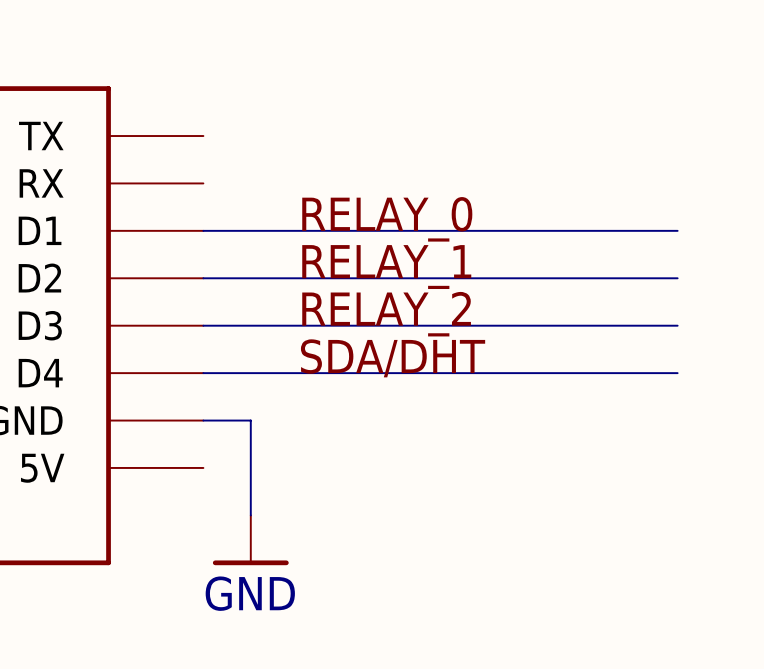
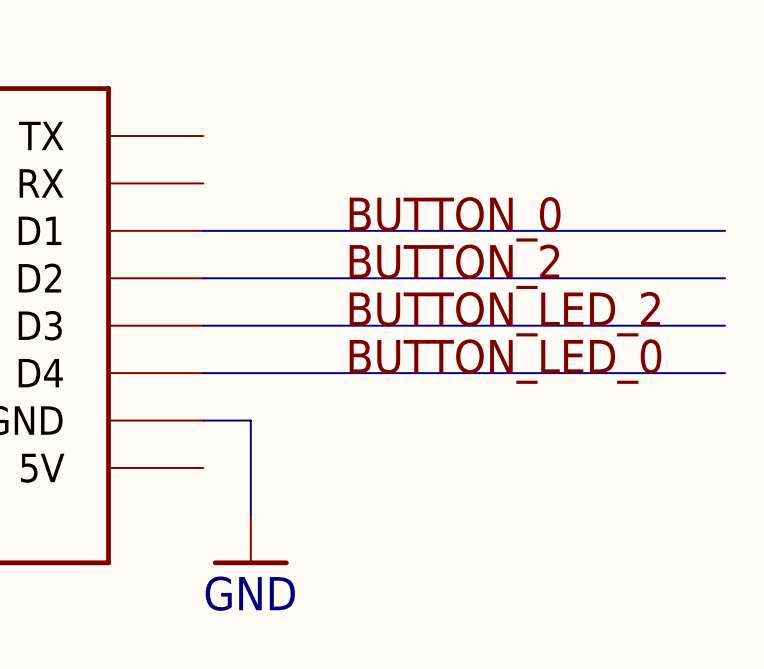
label: RELAY_0 (387, 219) -> none
label: none -> BUTTON_0 (455, 219)
wire: none -> (677, 230) (725, 230)
label: none -> BUTTON_2 (454, 266)
label: RELAY_1 (386, 267) -> none
wire: none -> (677, 278) (725, 278)
label: RELAY_2 (386, 314) -> none
label: none -> BUTTON_LED_2 (504, 314)
wire: none -> (677, 325) (725, 325)
label: SDA/DHT (393, 358) -> none
label: none -> BUTTON_LED_0 (505, 361)
wire: none -> (677, 373) (725, 373)

